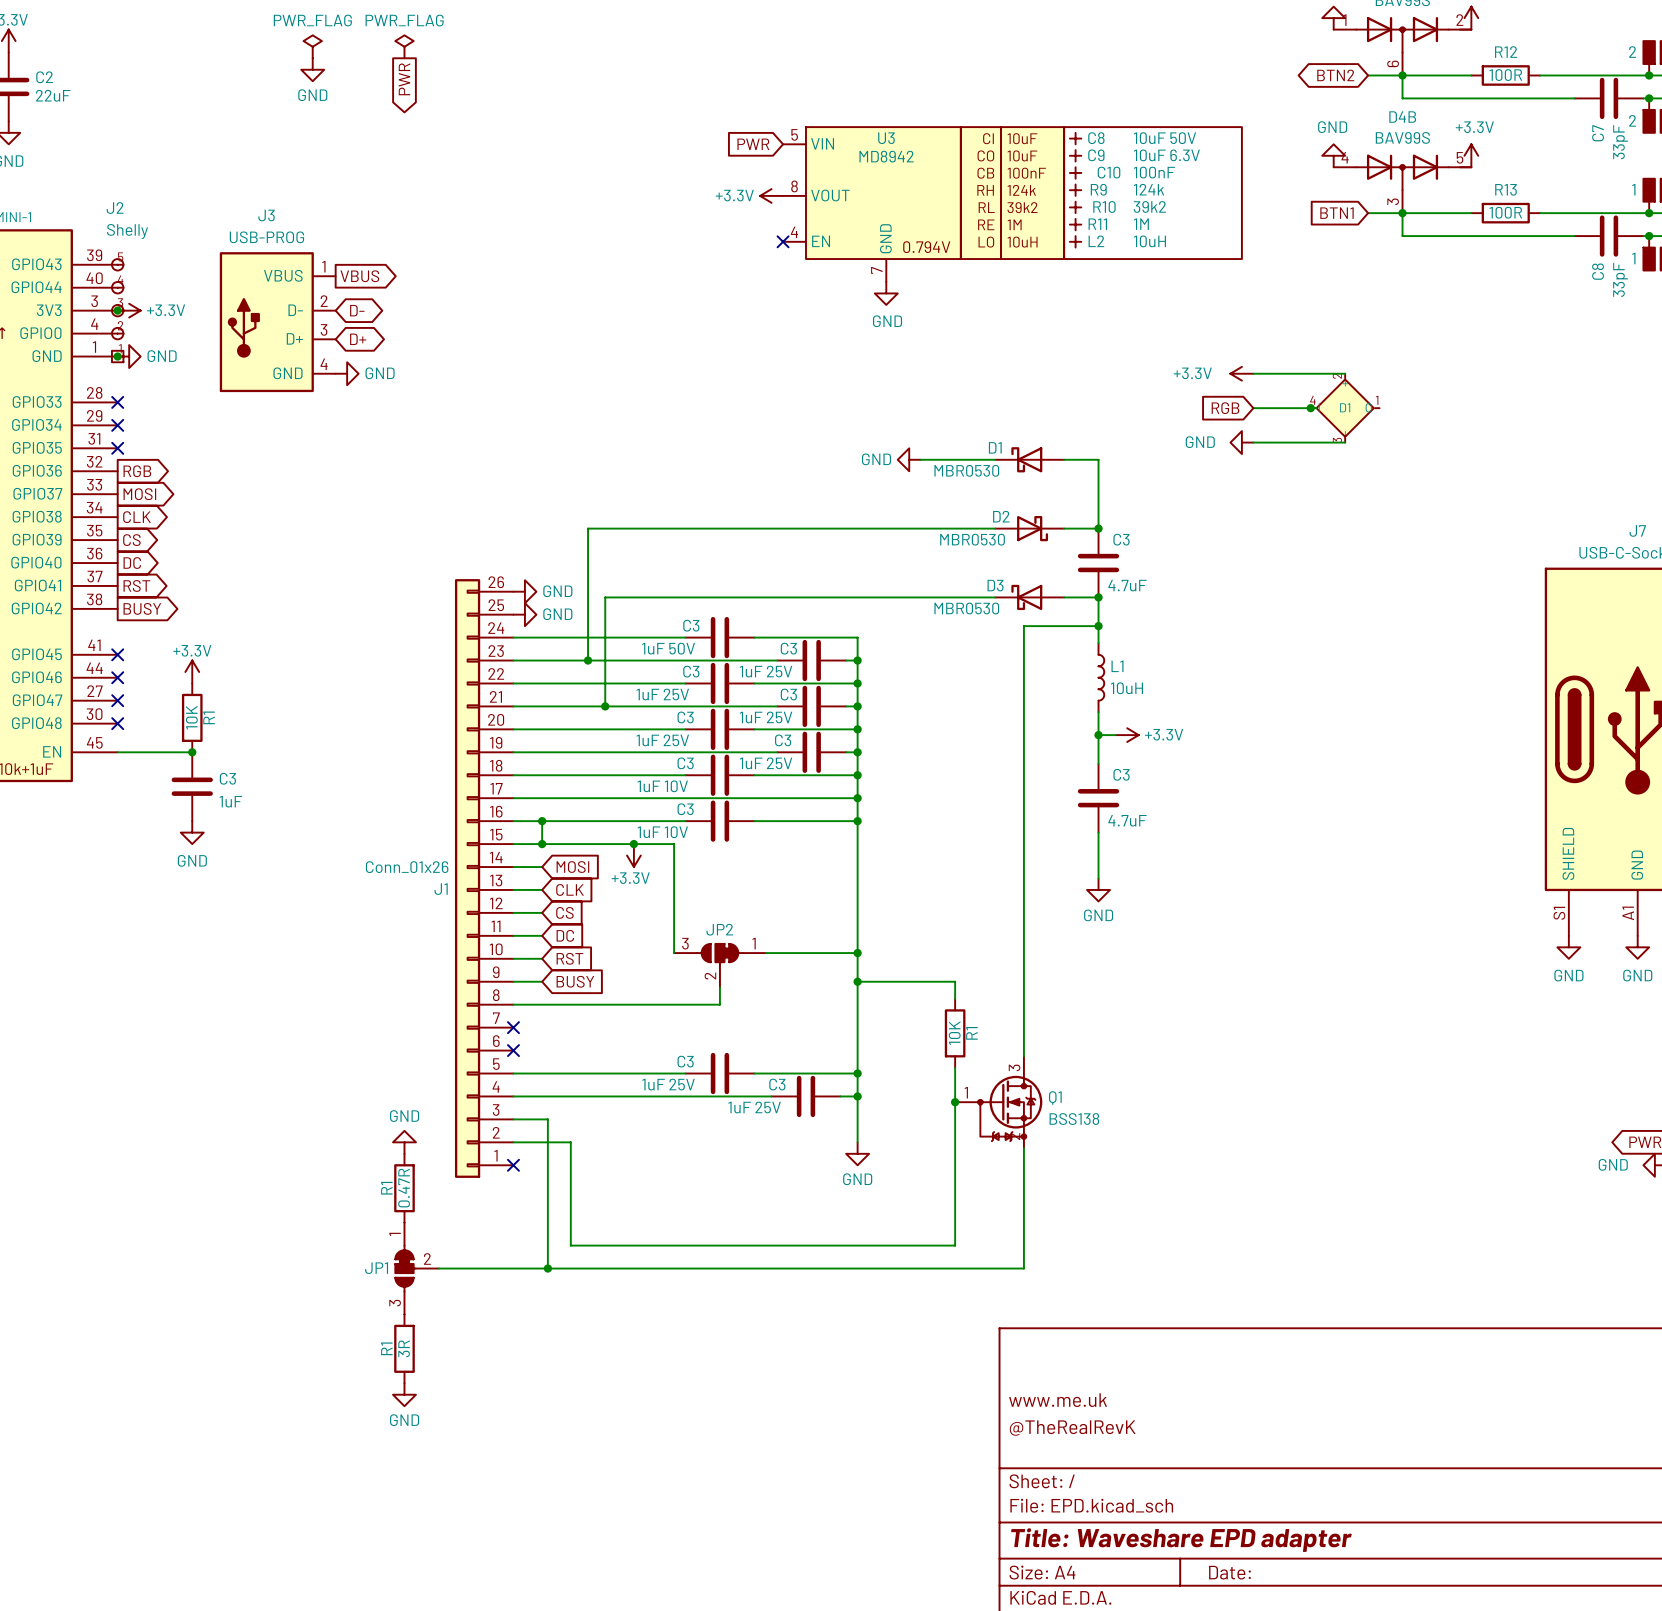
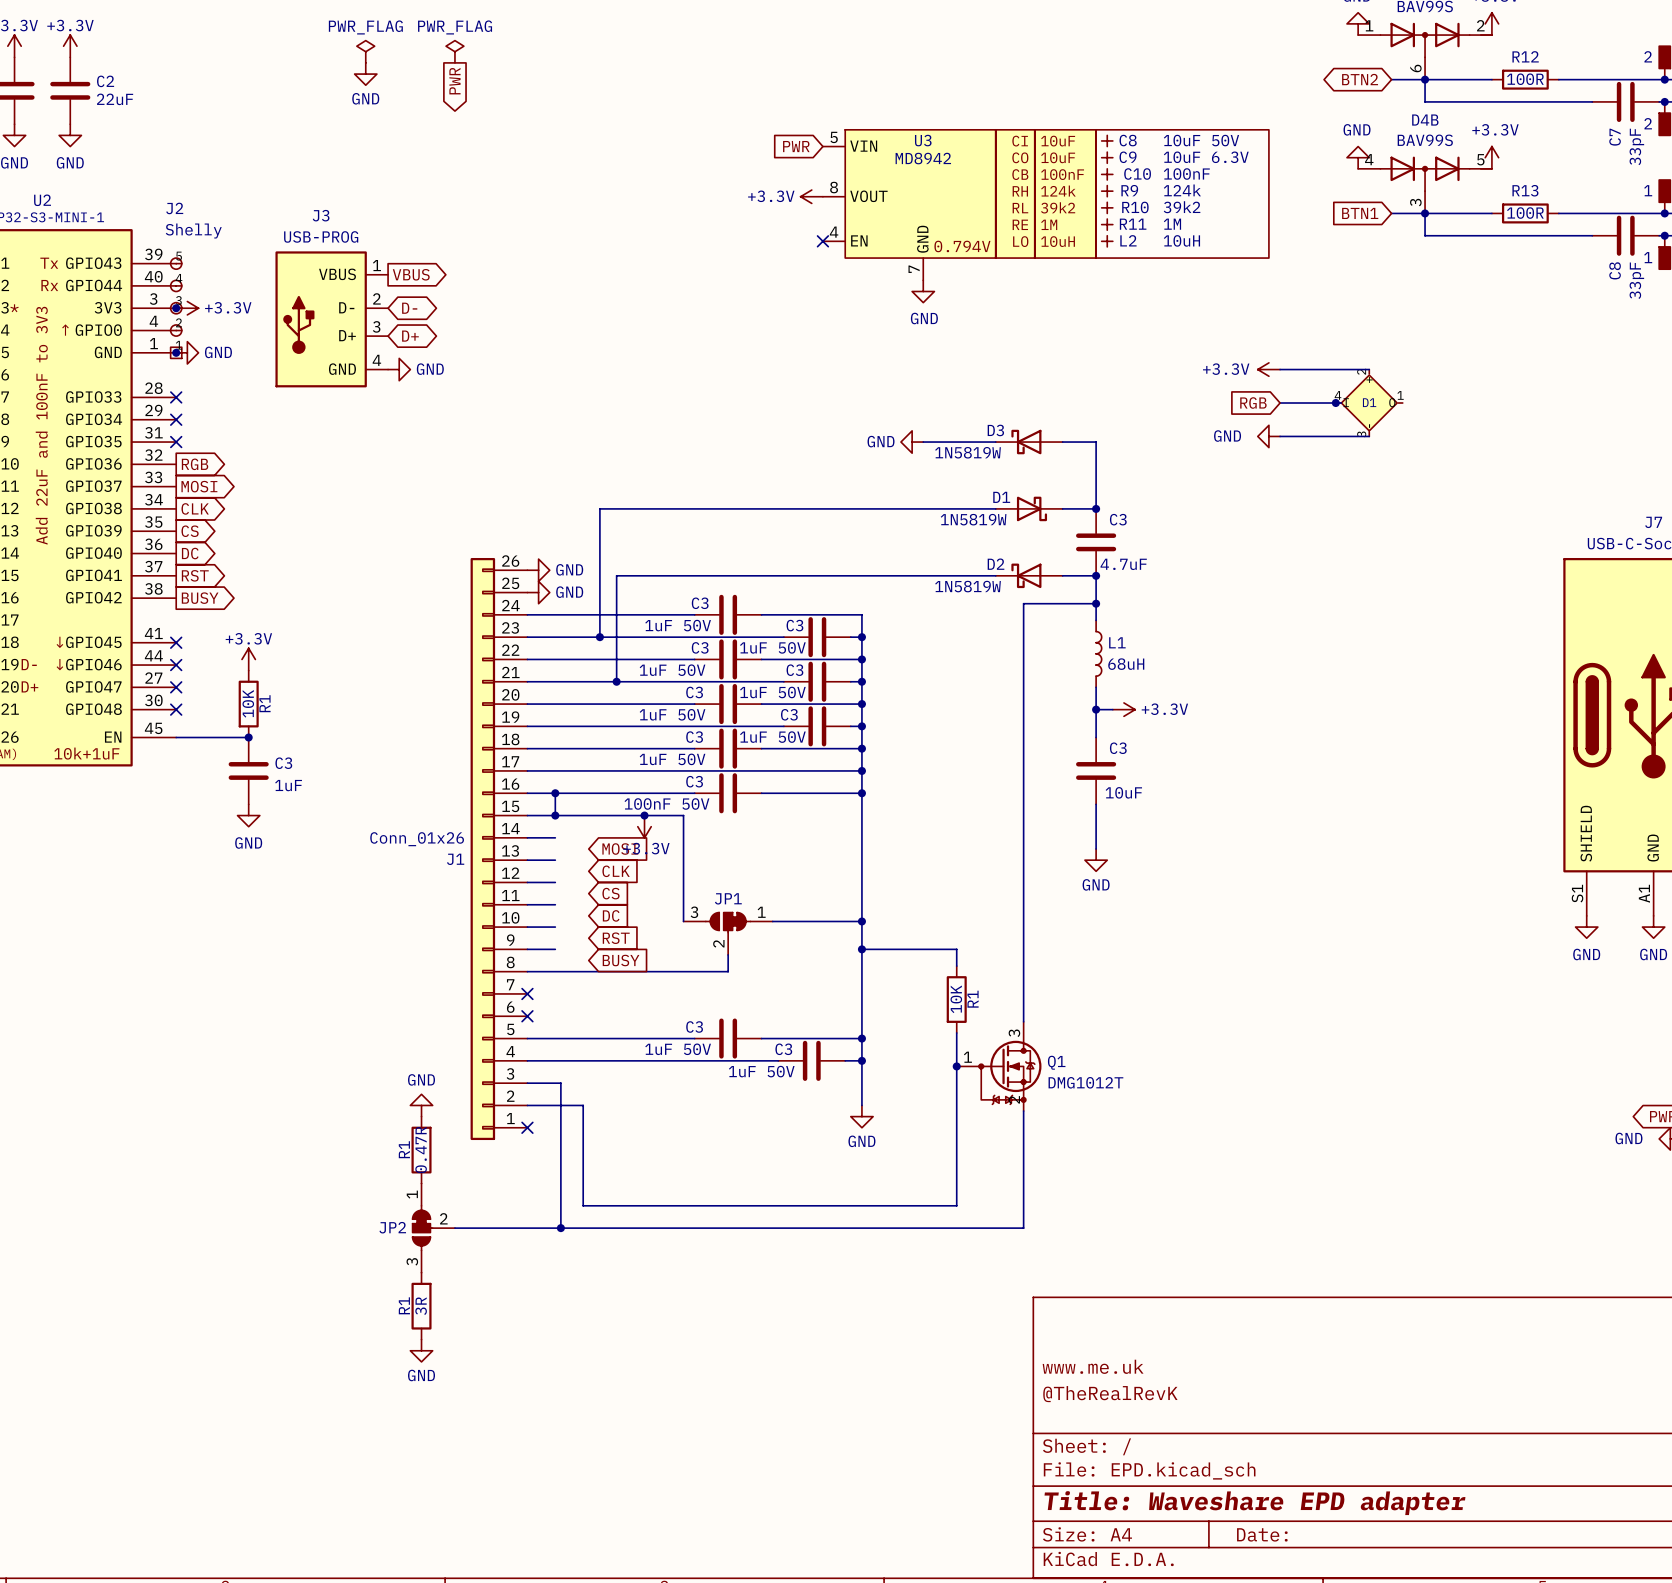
power symbol position: GND (909, 459) -> GND (912, 442)
wire: (920, 459) (995, 459) -> (923, 442) (995, 442)
D1: MBR0530 (1029, 459) -> none
wire: (1064, 459) (1098, 459) (1098, 528) (1064, 528) -> (1062, 442) (1096, 442) (1096, 508) (1062, 508)
D1: none -> 1N5819W (1029, 508)
junction: none -> (1096, 508)
wire: (995, 528) (588, 528) (588, 660) -> (995, 508) (599, 508) (599, 637)
D2 position: (1029, 528) -> (1029, 575)
D2 rotation: 0° (1032, 528) -> 180° (1026, 575)
junction: (1098, 528) -> none
D2 value: MBR0530 (972, 539) -> 1N5819W (968, 586)
C3 position: (1098, 563) -> (1096, 542)
power symbol: none -> GND (538, 570)
junction: none -> (1096, 575)
power symbol: GND (524, 591) -> none
wire: (995, 597) (605, 597) (605, 706) -> (995, 575) (616, 575) (616, 681)
D3 position: (1029, 597) -> (1029, 442)
wire: (1064, 597) (1098, 597) (1098, 643) -> (1062, 575) (1096, 575) (1096, 620)
junction: (1098, 597) -> none
power symbol: none -> GND (538, 592)
D3 value: MBR0530 (966, 608) -> 1N5819W (968, 452)
power symbol: GND (524, 614) -> none
junction: none -> (1096, 603)
C3: none -> 1uF 50V (728, 614)
wire: (1098, 626) (1023, 626) (1023, 1056) -> (1096, 603) (1023, 603) (1023, 1021)
junction: (1098, 626) -> none
wire: (513, 637) (685, 637) -> (527, 614) (694, 614)
C3: 1uF 50V (719, 637) -> none
wire: (754, 637) (857, 637) (857, 1142) -> (761, 614) (861, 614) (861, 1105)
junction: none -> (599, 637)
C3: none -> 1uF 50V (817, 637)
junction: none -> (861, 637)
wire: (513, 660) (777, 660) -> (527, 637) (783, 637)
junction: (588, 660) -> none
C3: 1uF 25V (811, 660) -> none
wire: (846, 660) (857, 660) -> (850, 637) (861, 637)
junction: (857, 660) -> none
C3: none -> 1uF 50V (728, 659)
junction: none -> (861, 659)
L1 position: (1101, 677) -> (1098, 653)
wire: (513, 683) (685, 683) -> (527, 659) (694, 659)
C3: 1uF 25V (719, 683) -> none
wire: (754, 683) (857, 683) -> (761, 659) (861, 659)
junction: (857, 683) -> none
L1 value: 10uH (1126, 688) -> 68uH (1126, 664)
junction: none -> (616, 681)
C3: none -> 1uF 50V (817, 681)
junction: none -> (861, 681)
wire: (513, 706) (777, 706) -> (527, 681) (783, 681)
junction: (605, 706) -> none
C3: 1uF 25V (811, 706) -> none
wire: (846, 706) (857, 706) -> (850, 681) (861, 681)
junction: (857, 706) -> none
wire: (1098, 712) (1098, 763) -> (1096, 687) (1096, 737)
C3: none -> 1uF 50V (728, 704)
junction: none -> (861, 704)
wire: (513, 729) (685, 729) -> (527, 704) (694, 704)
C3: 1uF 25V (719, 729) -> none
wire: (754, 729) (857, 729) -> (761, 704) (861, 704)
junction: (857, 729) -> none
wire: (1098, 735) (1115, 735) -> (1096, 709) (1112, 709)
junction position: (1098, 735) -> (1096, 709)
power symbol position: +3.3V (1127, 735) -> +3.3V (1123, 709)
C3: none -> 1uF 50V (817, 726)
junction: none -> (861, 726)
wire: (513, 752) (777, 752) -> (527, 726) (783, 726)
C3: 1uF 25V (811, 752) -> none
wire: (846, 752) (857, 752) -> (850, 726) (861, 726)
junction: (857, 752) -> none
C3: none -> 1uF 50V (728, 748)
junction: none -> (861, 748)
wire: (513, 775) (685, 775) -> (527, 748) (694, 748)
C3: 1uF 10V (719, 775) -> none
wire: (754, 775) (857, 775) -> (761, 748) (861, 748)
junction: (857, 775) -> none
junction: none -> (861, 770)
C3: none -> 10uF (1096, 770)
wire: (513, 798) (857, 798) -> (527, 770) (861, 770)
junction: (857, 798) -> none
C3: 4.7uF (1098, 798) -> none
junction: none -> (555, 793)
C3: none -> 100nF 50V (728, 793)
junction: none -> (861, 793)
wire: (513, 821) (685, 821) -> (527, 793) (694, 793)
wire: (542, 821) (542, 844) -> (555, 793) (555, 815)
junction: (542, 821) -> none
C3: 1uF 10V (719, 821) -> none
wire: (754, 821) (857, 821) -> (761, 793) (861, 793)
junction: (857, 821) -> none
junction: none -> (555, 815)
junction: none -> (644, 815)
wire: (1098, 832) (1098, 878) -> (1096, 804) (1096, 849)
wire: (513, 844) (674, 844) (674, 953) -> (527, 815) (683, 815) (683, 921)
junction: (542, 844) -> none
junction: (633, 844) -> none
power symbol position: +3.3V (633, 855) -> +3.3V (644, 826)
wire: (513, 867) (542, 867) -> (527, 837) (555, 837)
J1 position: (484, 878) -> (499, 849)
wire: (513, 889) (542, 889) -> (527, 860) (555, 860)
power symbol position: GND (1098, 889) -> GND (1096, 860)
wire: (513, 912) (542, 912) -> (527, 882) (555, 882)
wire: (513, 935) (542, 935) -> (527, 904) (555, 904)
junction: none -> (861, 921)
wire: (765, 953) (857, 953) -> (772, 921) (861, 921)
junction: (857, 953) -> none
JP2 rotation: 0° (719, 954) -> 90° counterclockwise (422, 1228)
wire: (513, 958) (542, 958) -> (527, 927) (555, 927)
JP2 position: (719, 965) -> (433, 1228)
junction: none -> (861, 949)
wire: (513, 981) (542, 981) -> (527, 949) (555, 949)
wire: (857, 981) (955, 981) (955, 998) -> (861, 949) (956, 949) (956, 966)
junction: (857, 981) -> none
wire: (719, 987) (719, 1004) (513, 1004) -> (728, 954) (728, 971) (527, 971)
no-connect mark: none -> (527, 993)
no-connect mark: (513, 1027) -> none
R1 position: (955, 1033) -> (956, 999)
no-connect mark: none -> (527, 1016)
no-connect mark: (513, 1050) -> none
C3: none -> 1uF 50V (728, 1038)
junction: none -> (861, 1038)
wire: (955, 1067) (955, 1245) (570, 1245) (570, 1142) (513, 1142) -> (956, 1032) (956, 1205) (583, 1205) (583, 1105) (527, 1105)
wire: (513, 1073) (685, 1073) -> (527, 1038) (694, 1038)
C3: 1uF 25V (719, 1073) -> none
wire: (754, 1073) (857, 1073) -> (761, 1038) (861, 1038)
junction: (857, 1073) -> none
C3: none -> 1uF 50V (811, 1060)
junction: none -> (861, 1060)
junction: none -> (956, 1066)
wire: (513, 1096) (771, 1096) -> (527, 1060) (778, 1060)
C3: 1uF 25V (805, 1096) -> none
wire: (840, 1096) (857, 1096) -> (845, 1060) (861, 1060)
junction: (857, 1096) -> none
junction: (955, 1102) -> none
Q1 position: (998, 1102) -> (999, 1066)
wire: (513, 1119) (547, 1119) (547, 1268) -> (527, 1083) (560, 1083) (560, 1228)
Q1 value: BSS138 (1074, 1119) -> DMG1012T (1085, 1082)
power symbol position: GND (404, 1142) -> GND (421, 1105)
wire: (1023, 1148) (1023, 1268) (438, 1268) -> (1023, 1111) (1023, 1228) (454, 1228)
power symbol position: GND (857, 1153) -> GND (861, 1116)
no-connect mark position: (513, 1165) -> (527, 1127)
R1 position: (404, 1188) -> (421, 1150)
JP1 rotation: 0° (405, 1268) -> 90° clockwise (728, 922)
JP1 position: (417, 1268) -> (728, 933)
junction position: (547, 1268) -> (560, 1228)
R1 position: (404, 1348) -> (421, 1306)
power symbol position: GND (404, 1394) -> GND (421, 1350)

